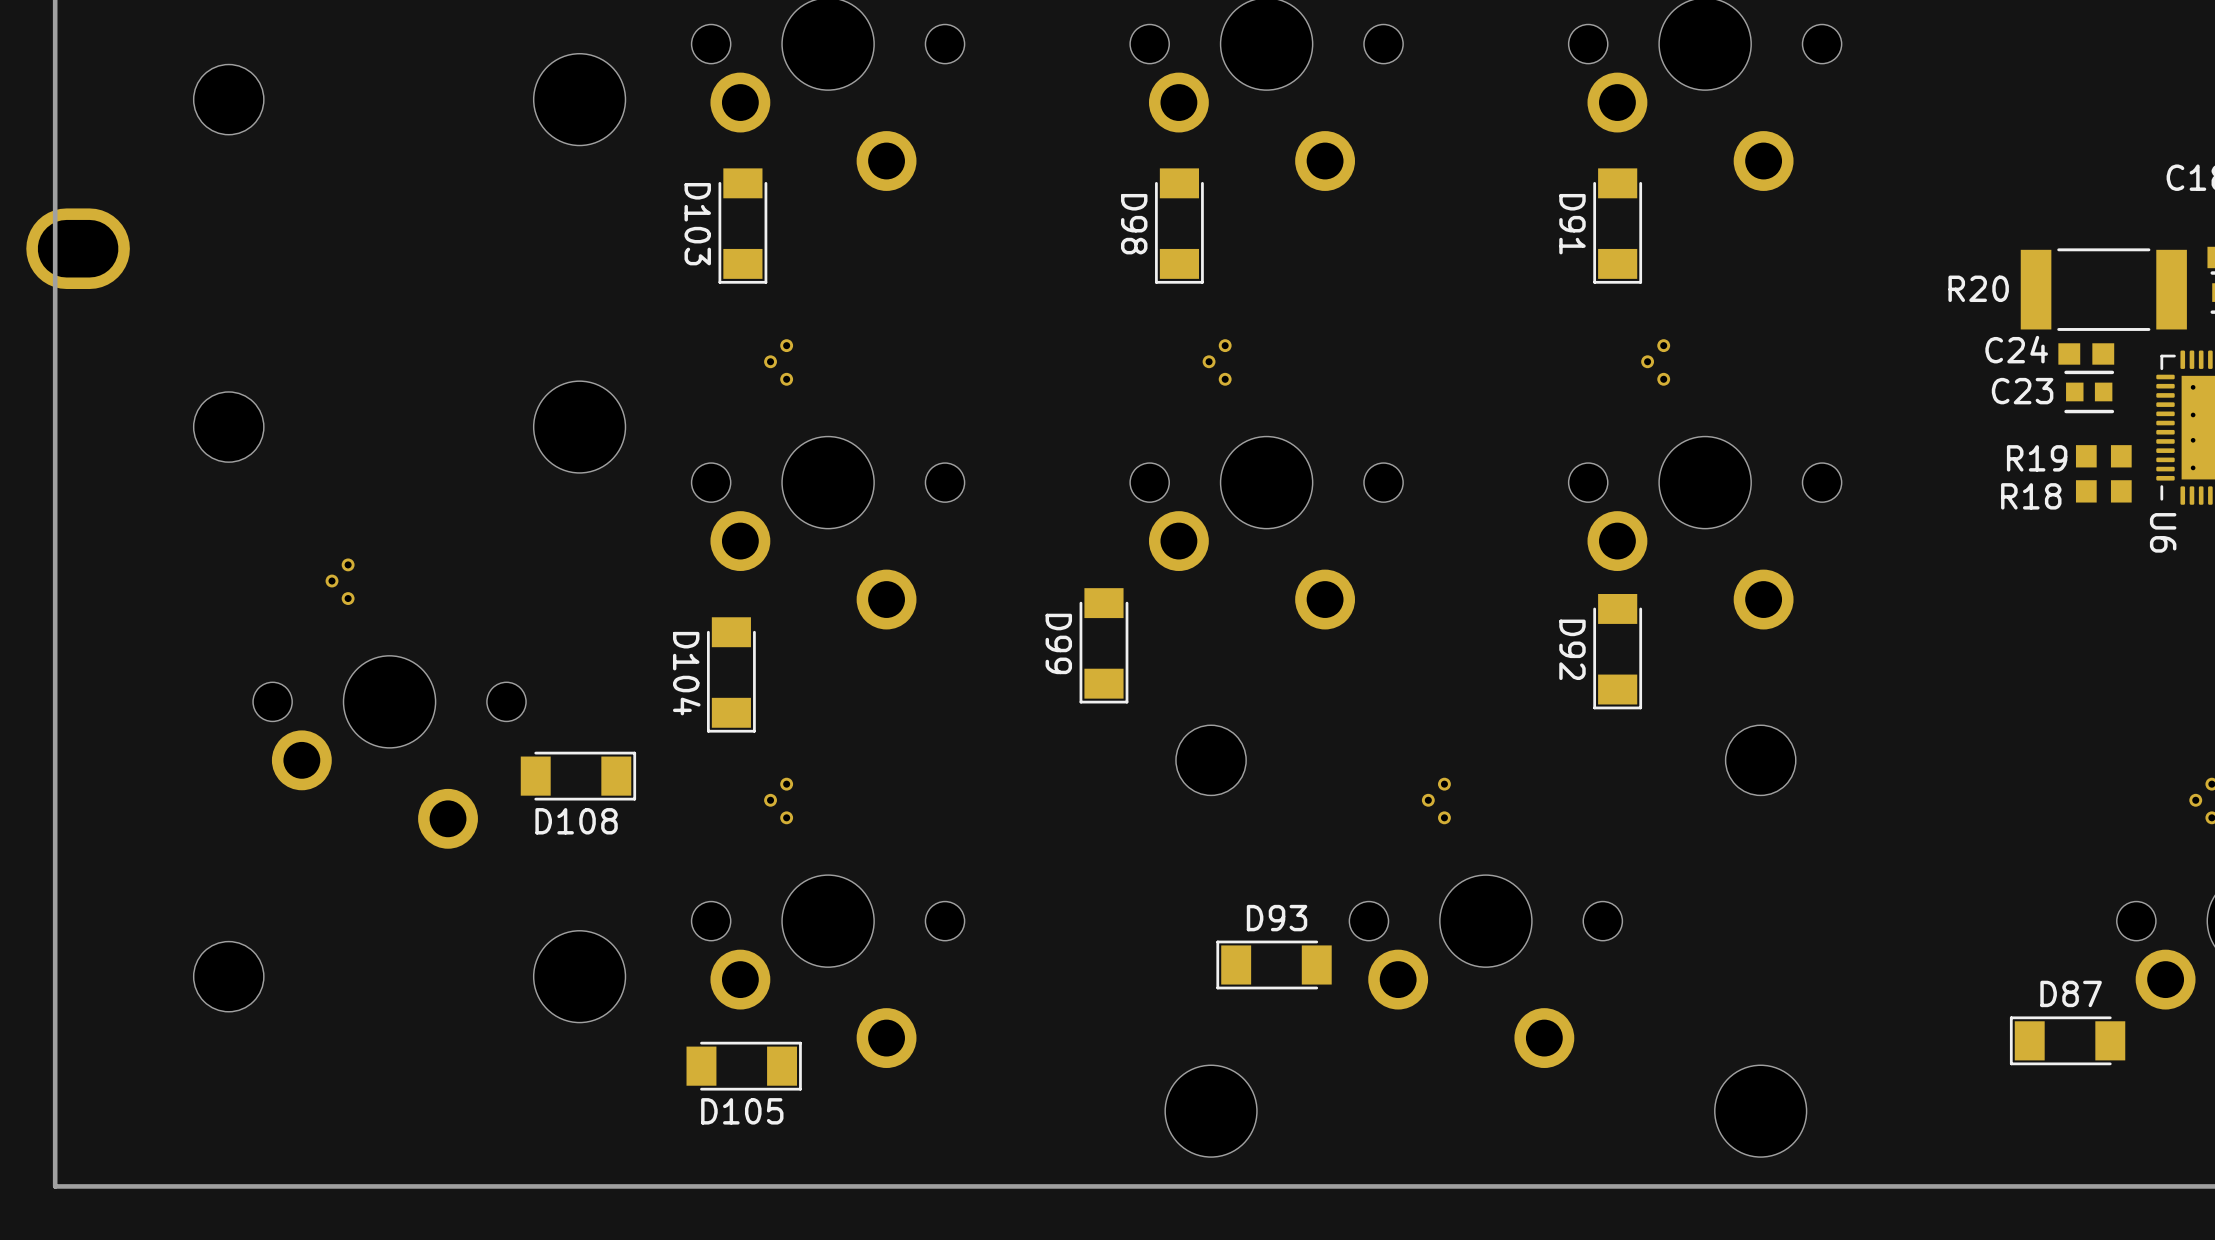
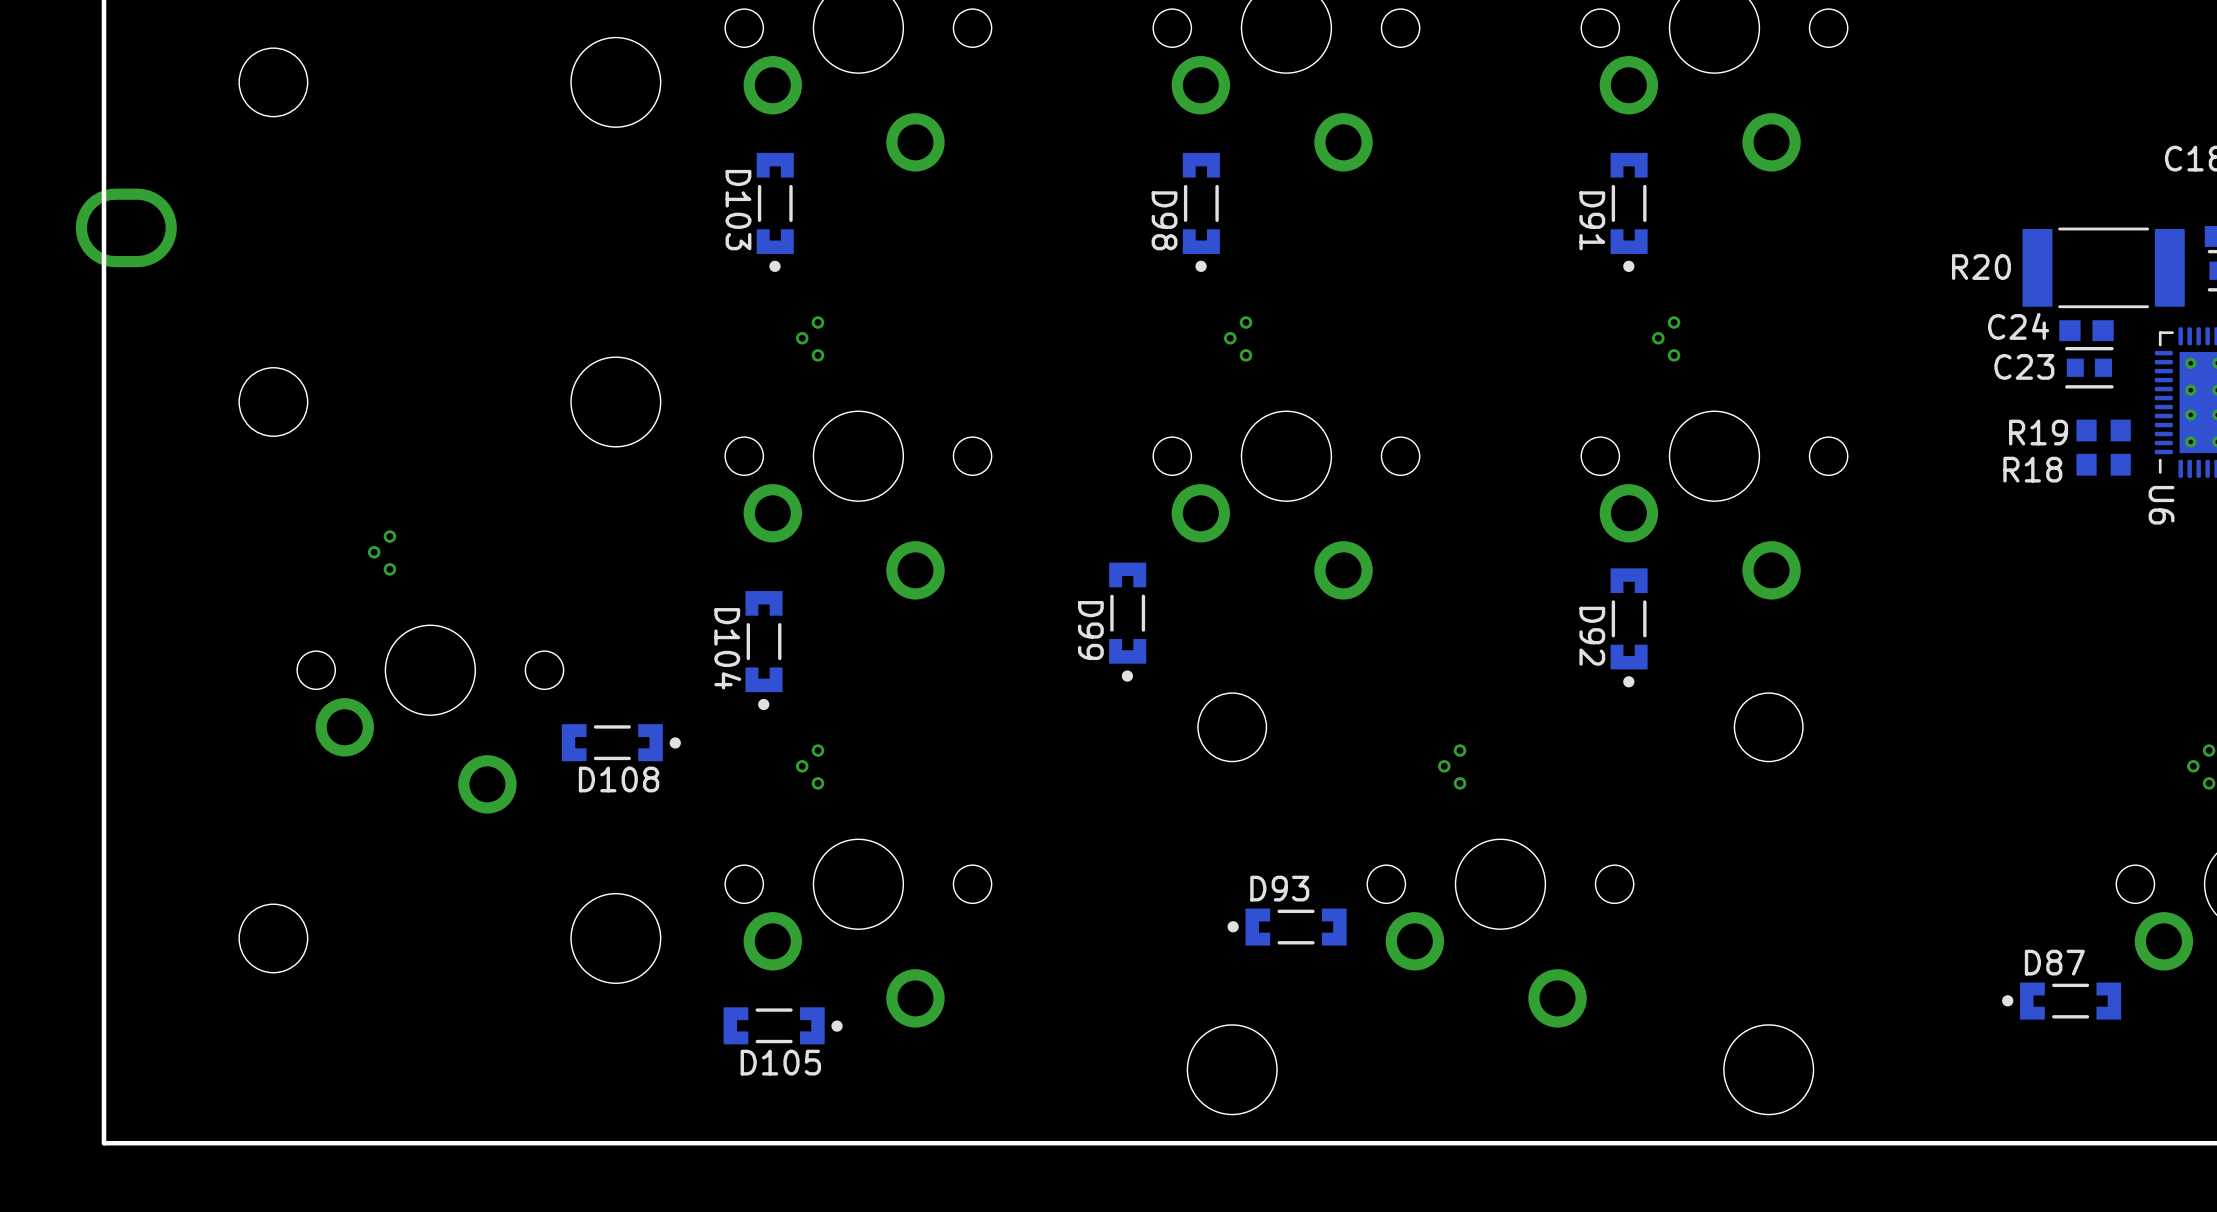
D103 footprint: [718, 168, 768, 284] -> [756, 152, 794, 272]
D98 footprint: [1155, 168, 1204, 284] -> [1182, 152, 1220, 272]
D91 footprint: [1593, 168, 1643, 284] -> [1610, 152, 1648, 272]
D99 footprint: [1079, 588, 1129, 704] -> [1109, 562, 1147, 682]
D92 footprint: [1593, 593, 1643, 710] -> [1610, 568, 1648, 688]
D104 footprint: [707, 617, 756, 733] -> [745, 591, 783, 711]
D108 footprint: [520, 751, 637, 801] -> [561, 724, 681, 762]
D93 footprint: [1216, 940, 1332, 990] -> [1227, 908, 1347, 946]
D87 footprint: [2009, 1016, 2126, 1066] -> [2002, 982, 2122, 1020]
D105 footprint: [686, 1041, 802, 1091] -> [723, 1007, 843, 1045]

